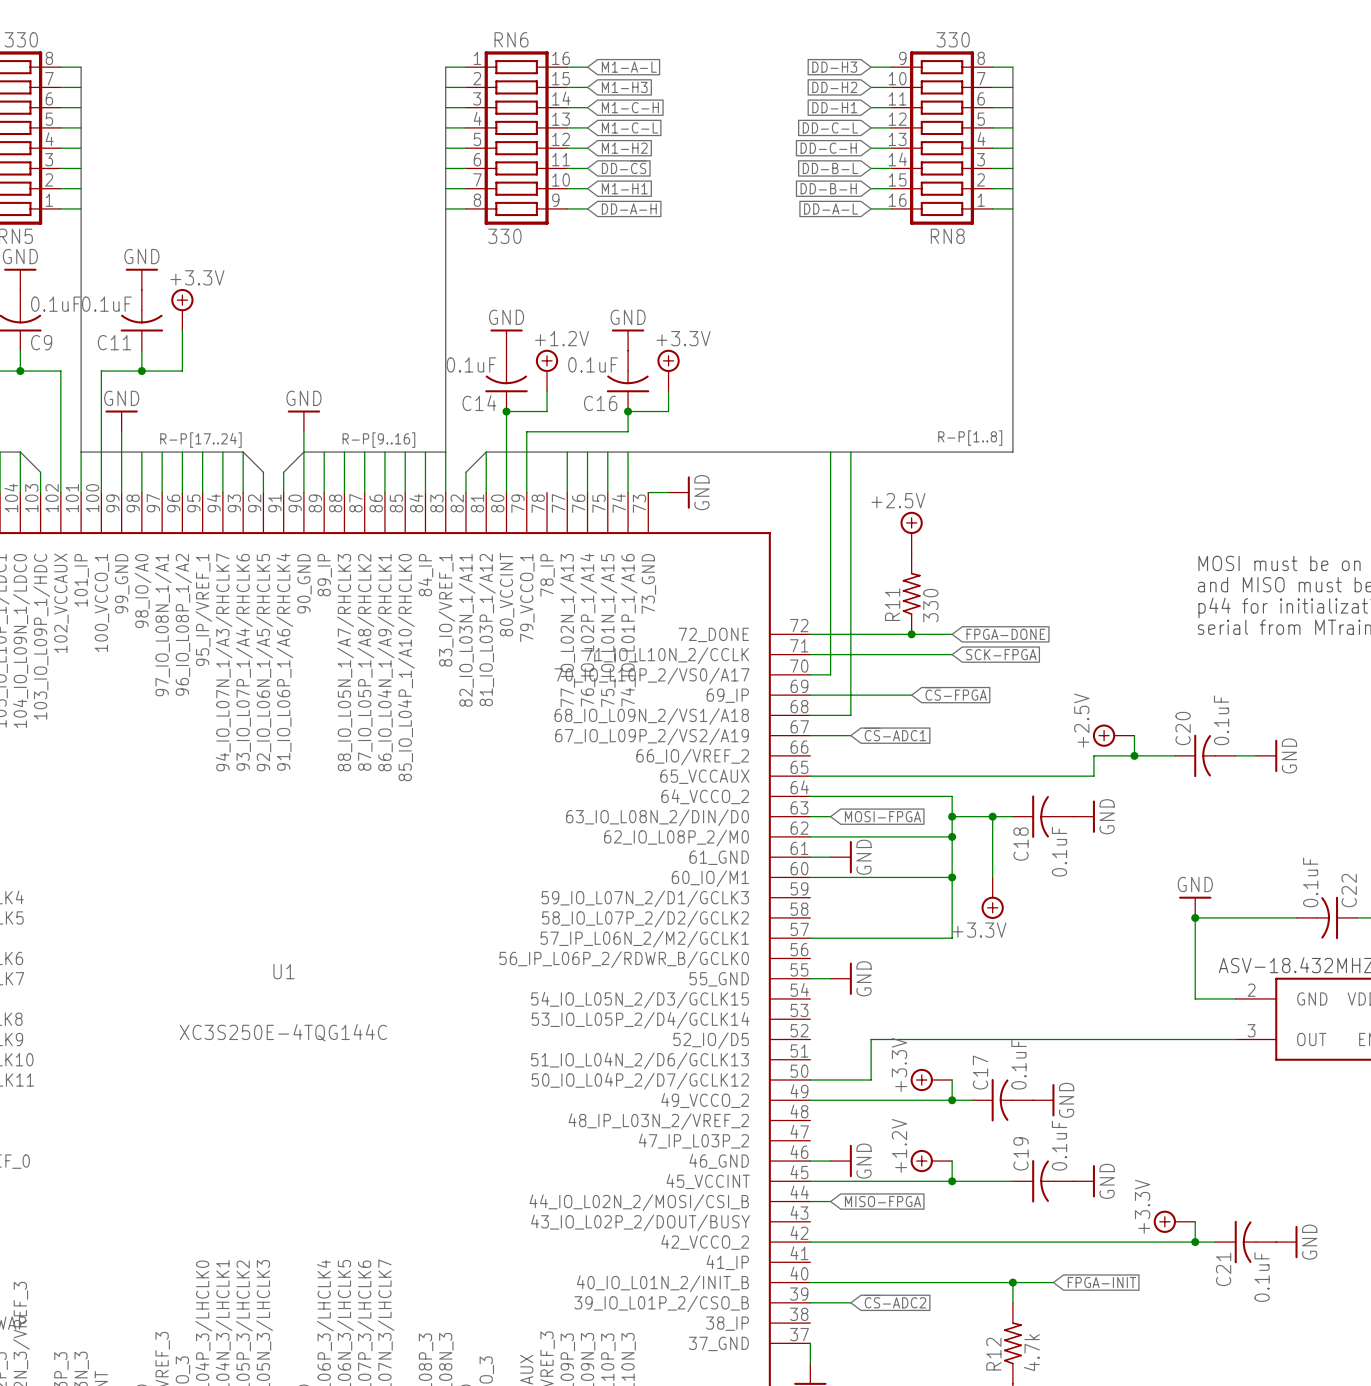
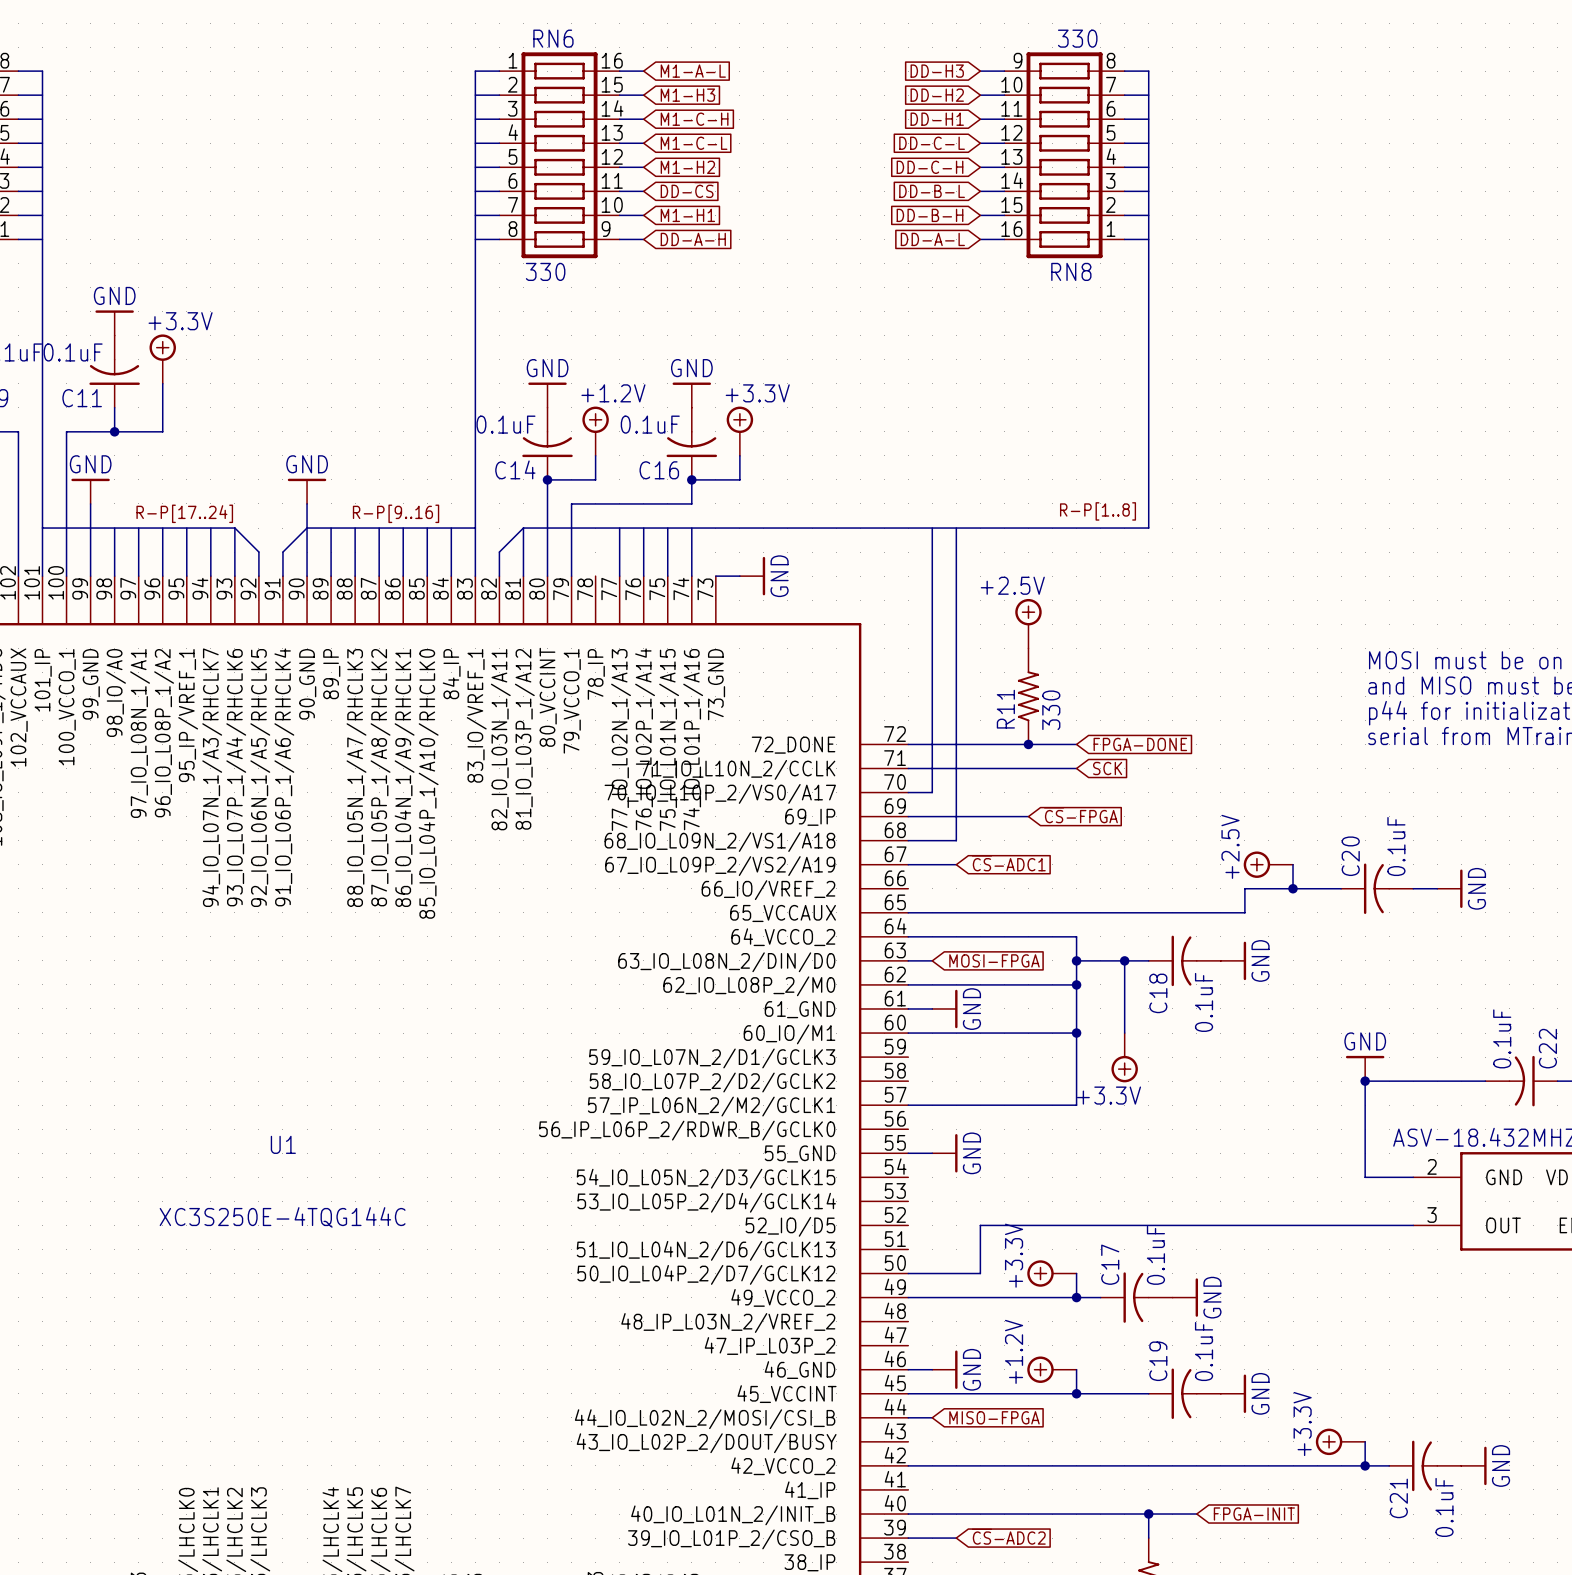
global label: SCK-FPGA (1001, 654) -> SCK (1107, 768)

